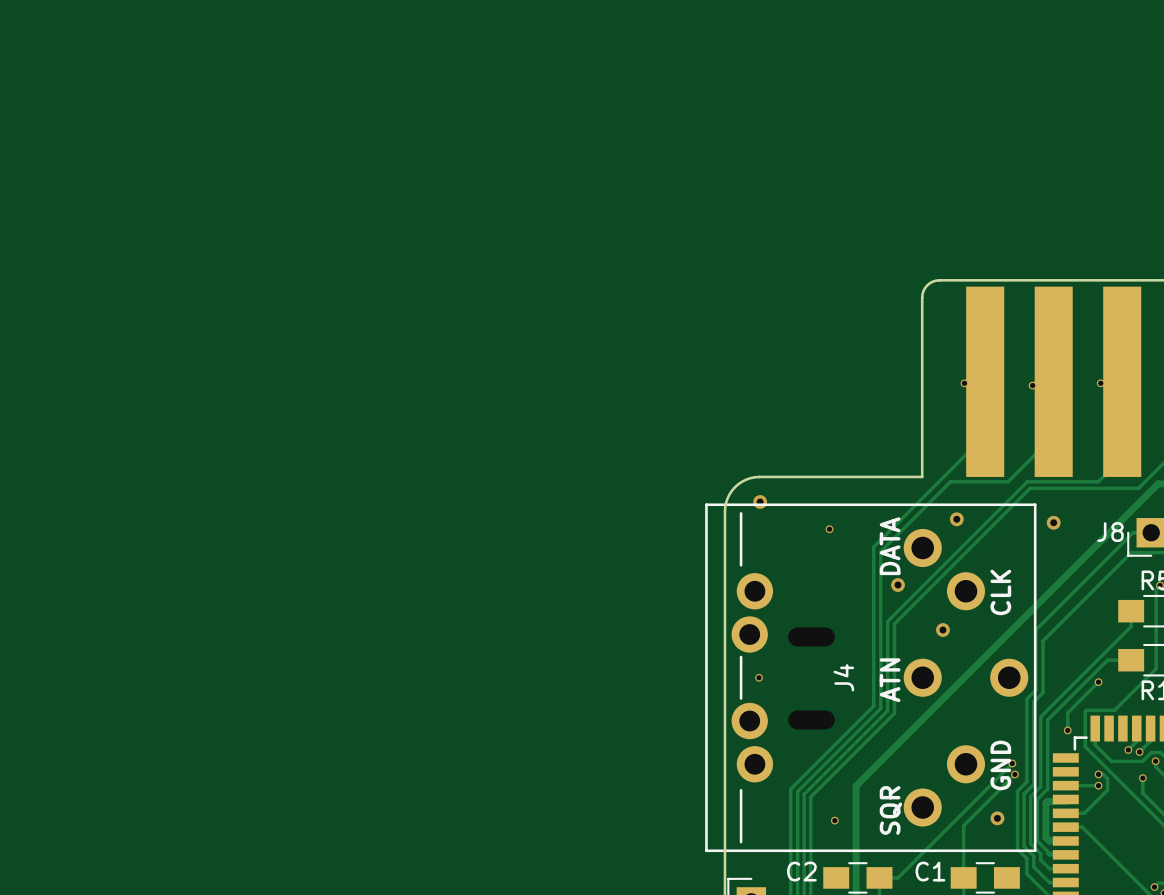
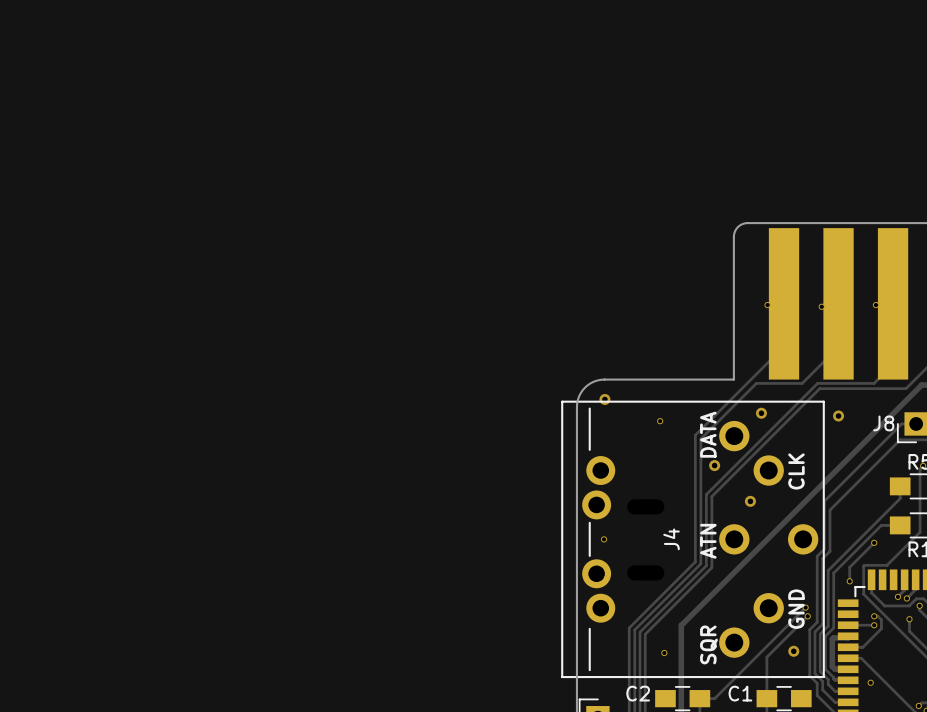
via: none -> (870, 682)

